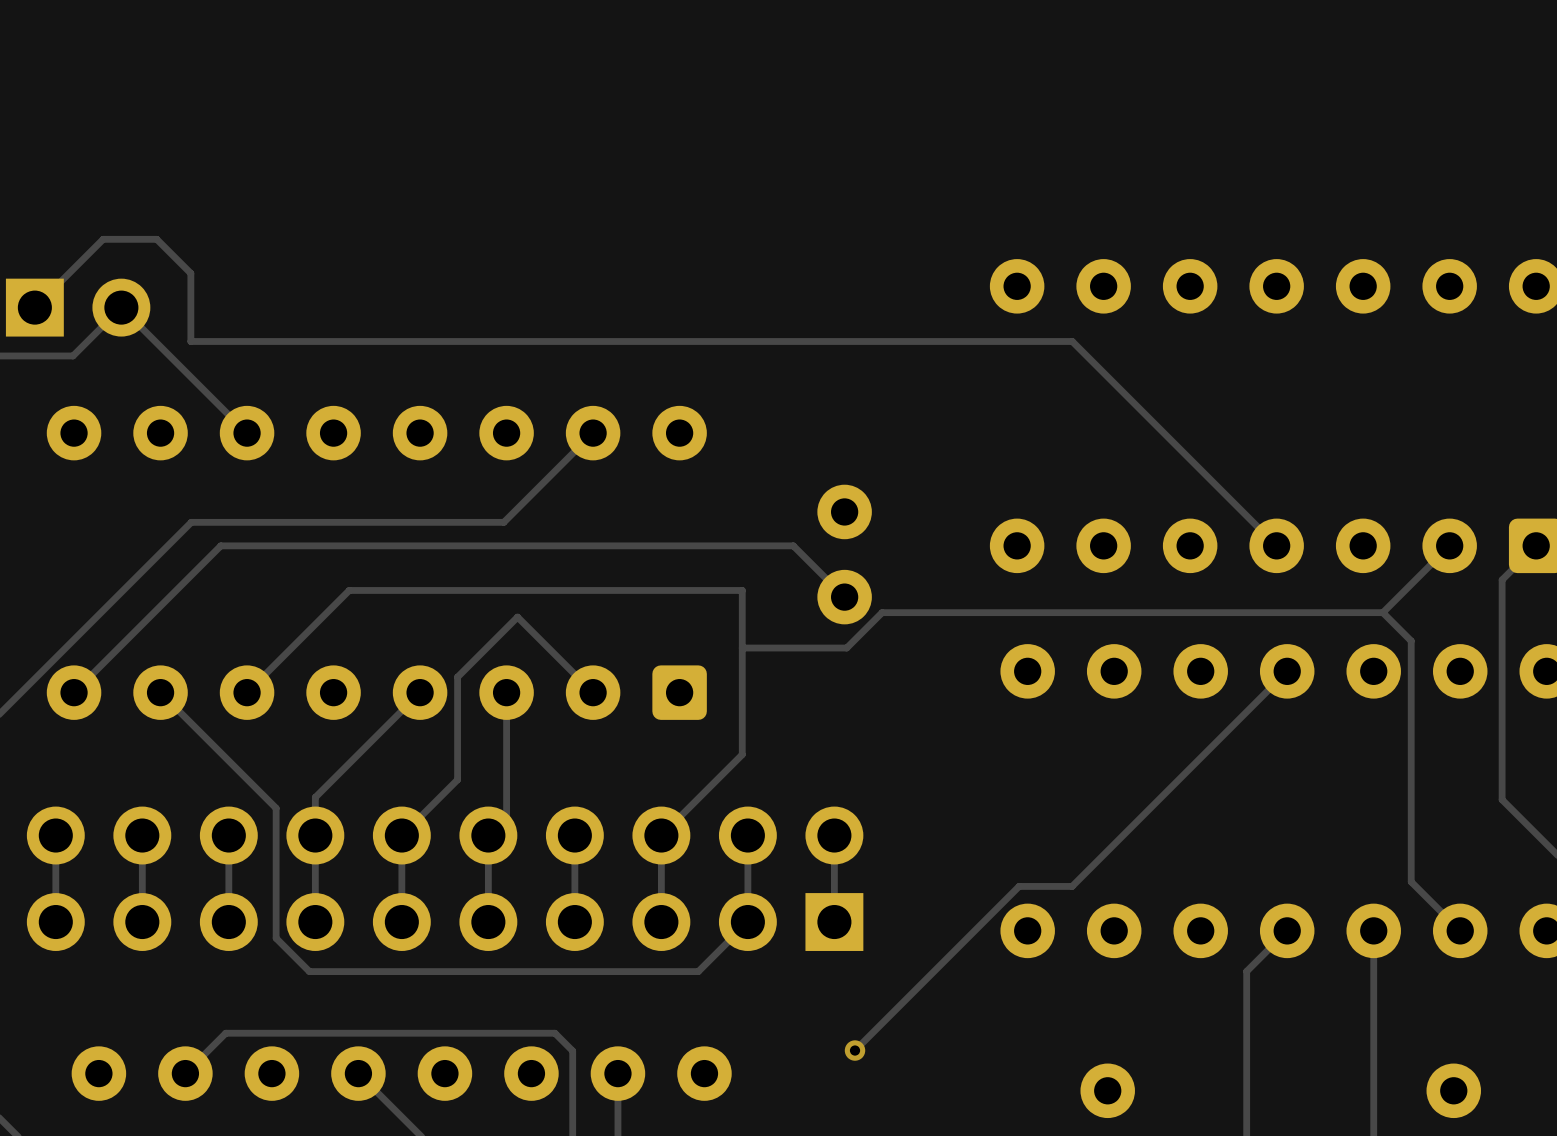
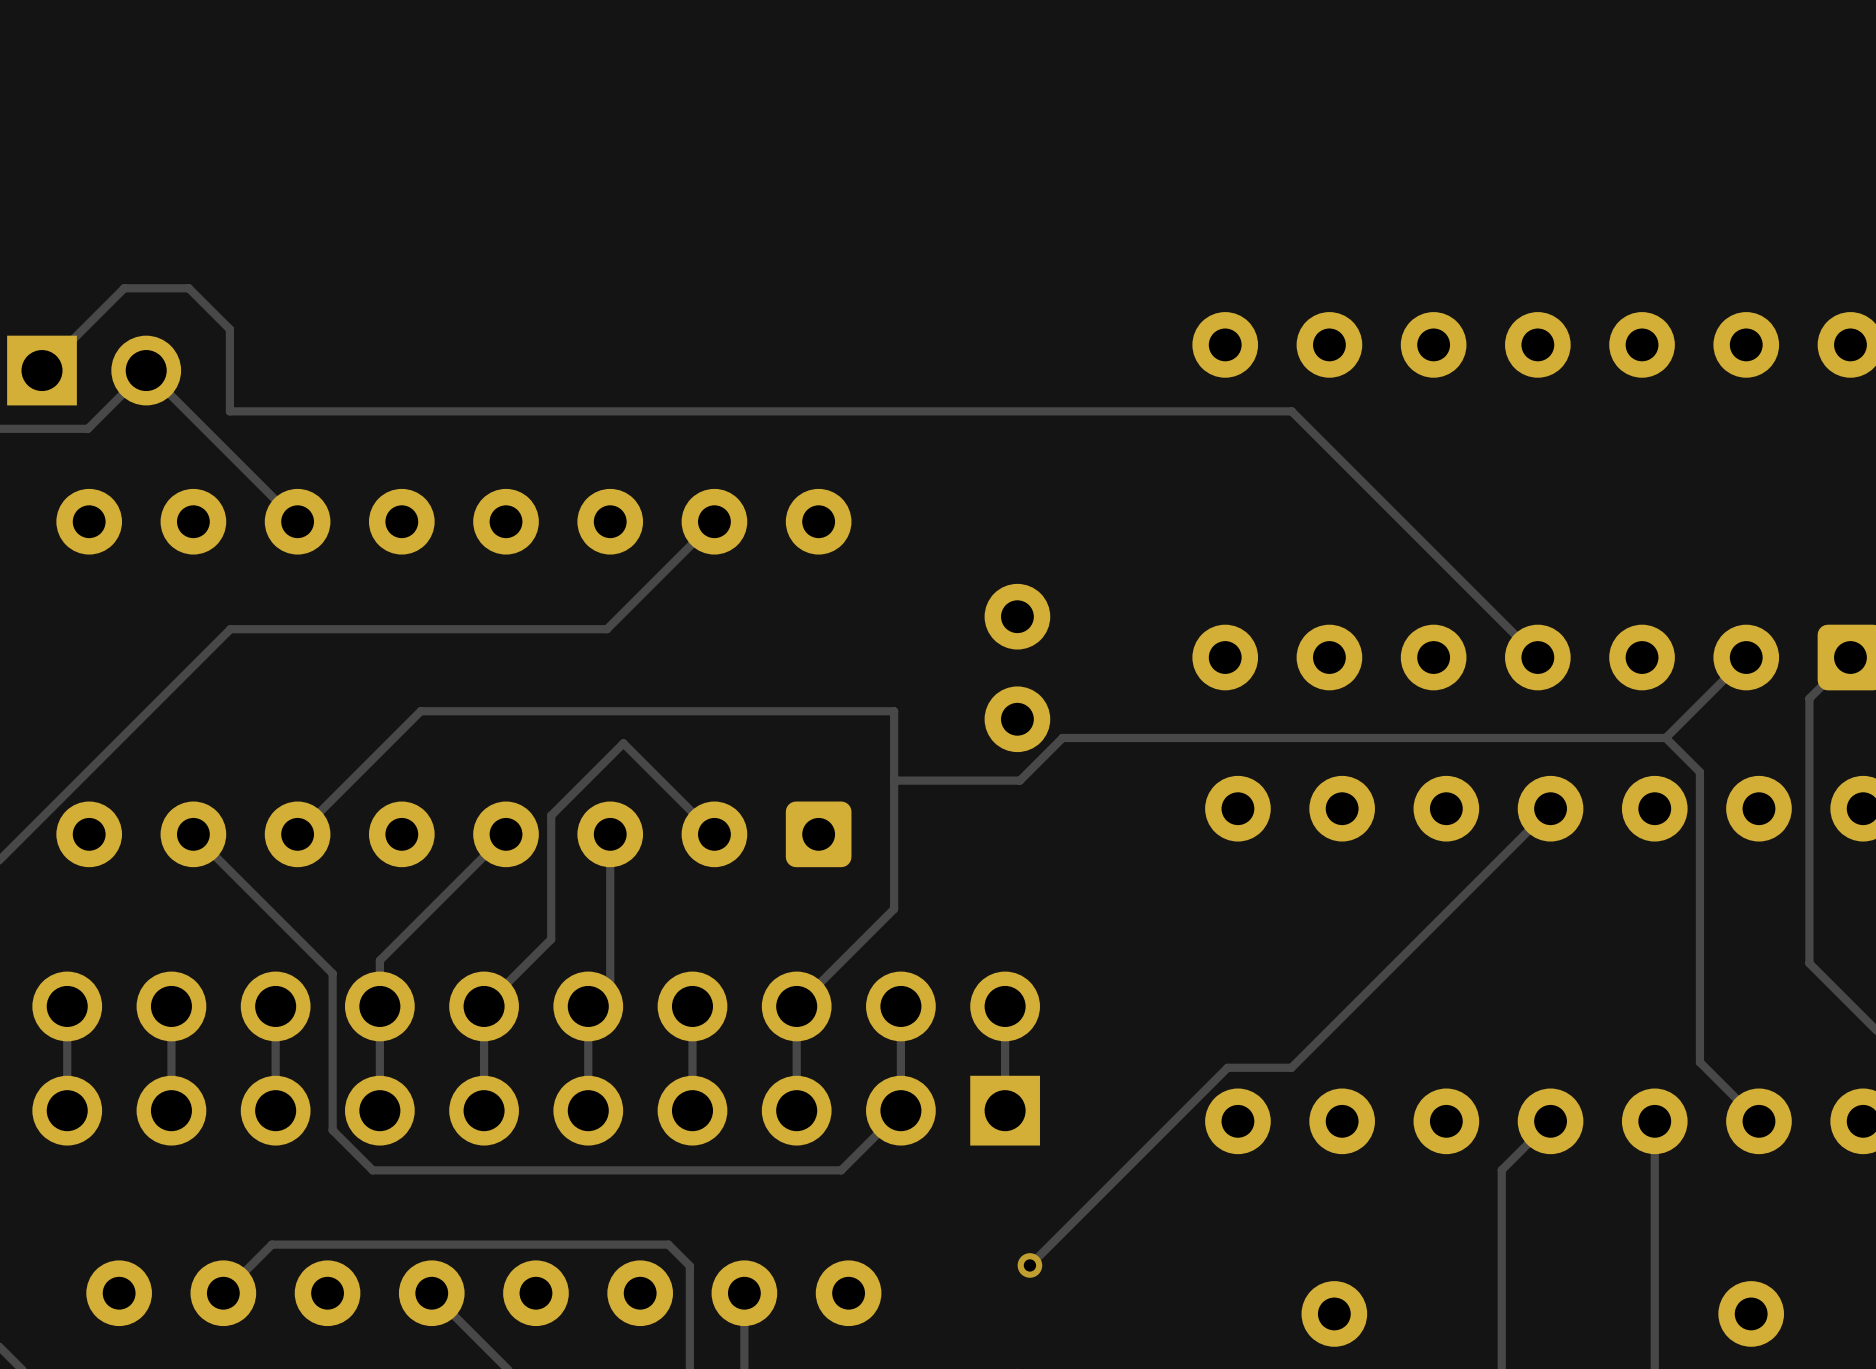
track: (844, 597) (793, 545) (220, 545) (74, 692) -> none

